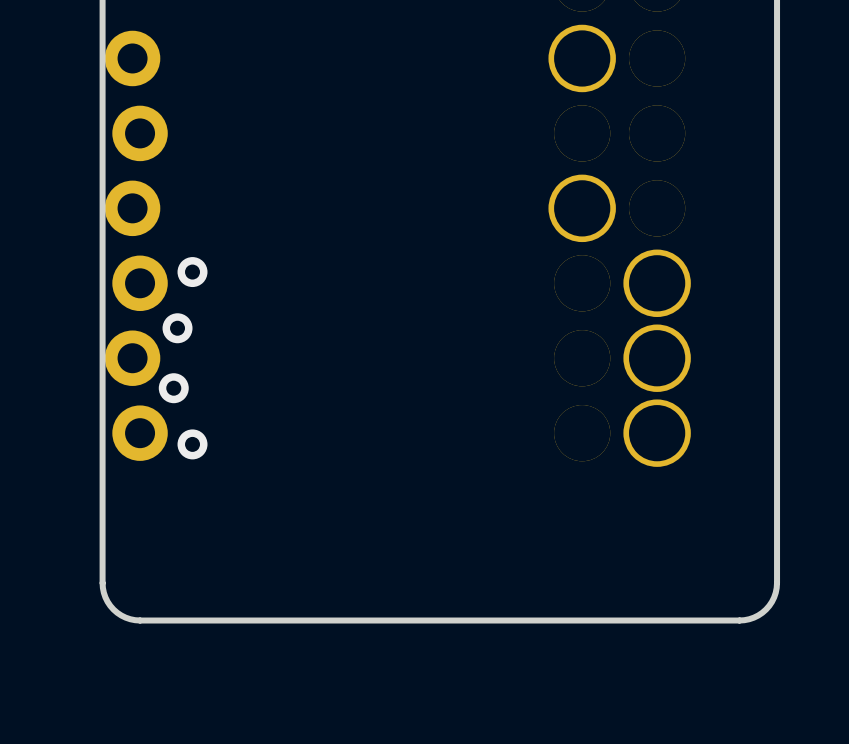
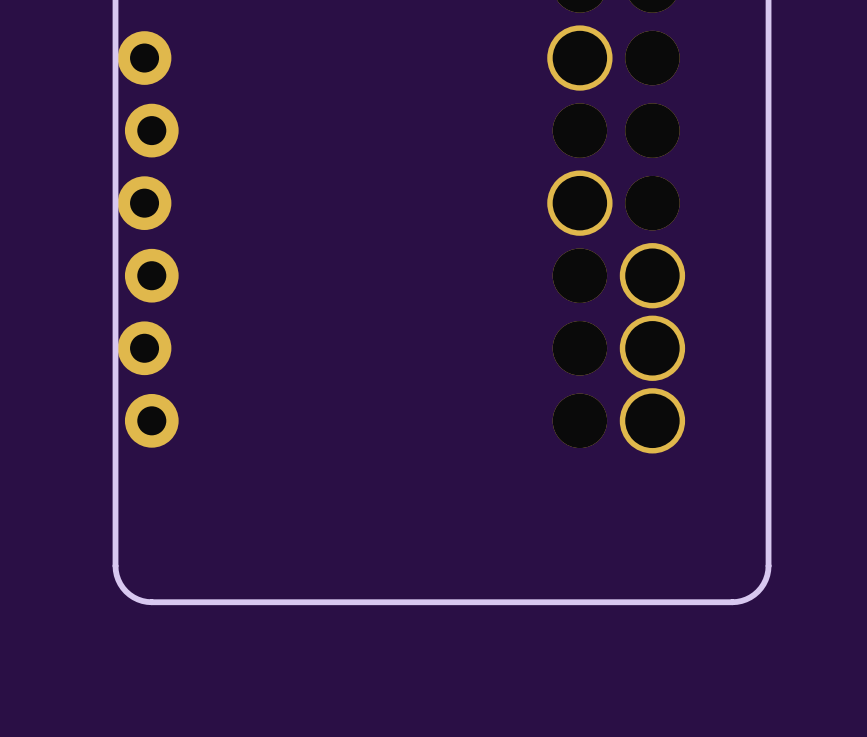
via: (192, 272) -> none
via: (177, 328) -> none
via: (173, 388) -> none
via: (192, 444) -> none

